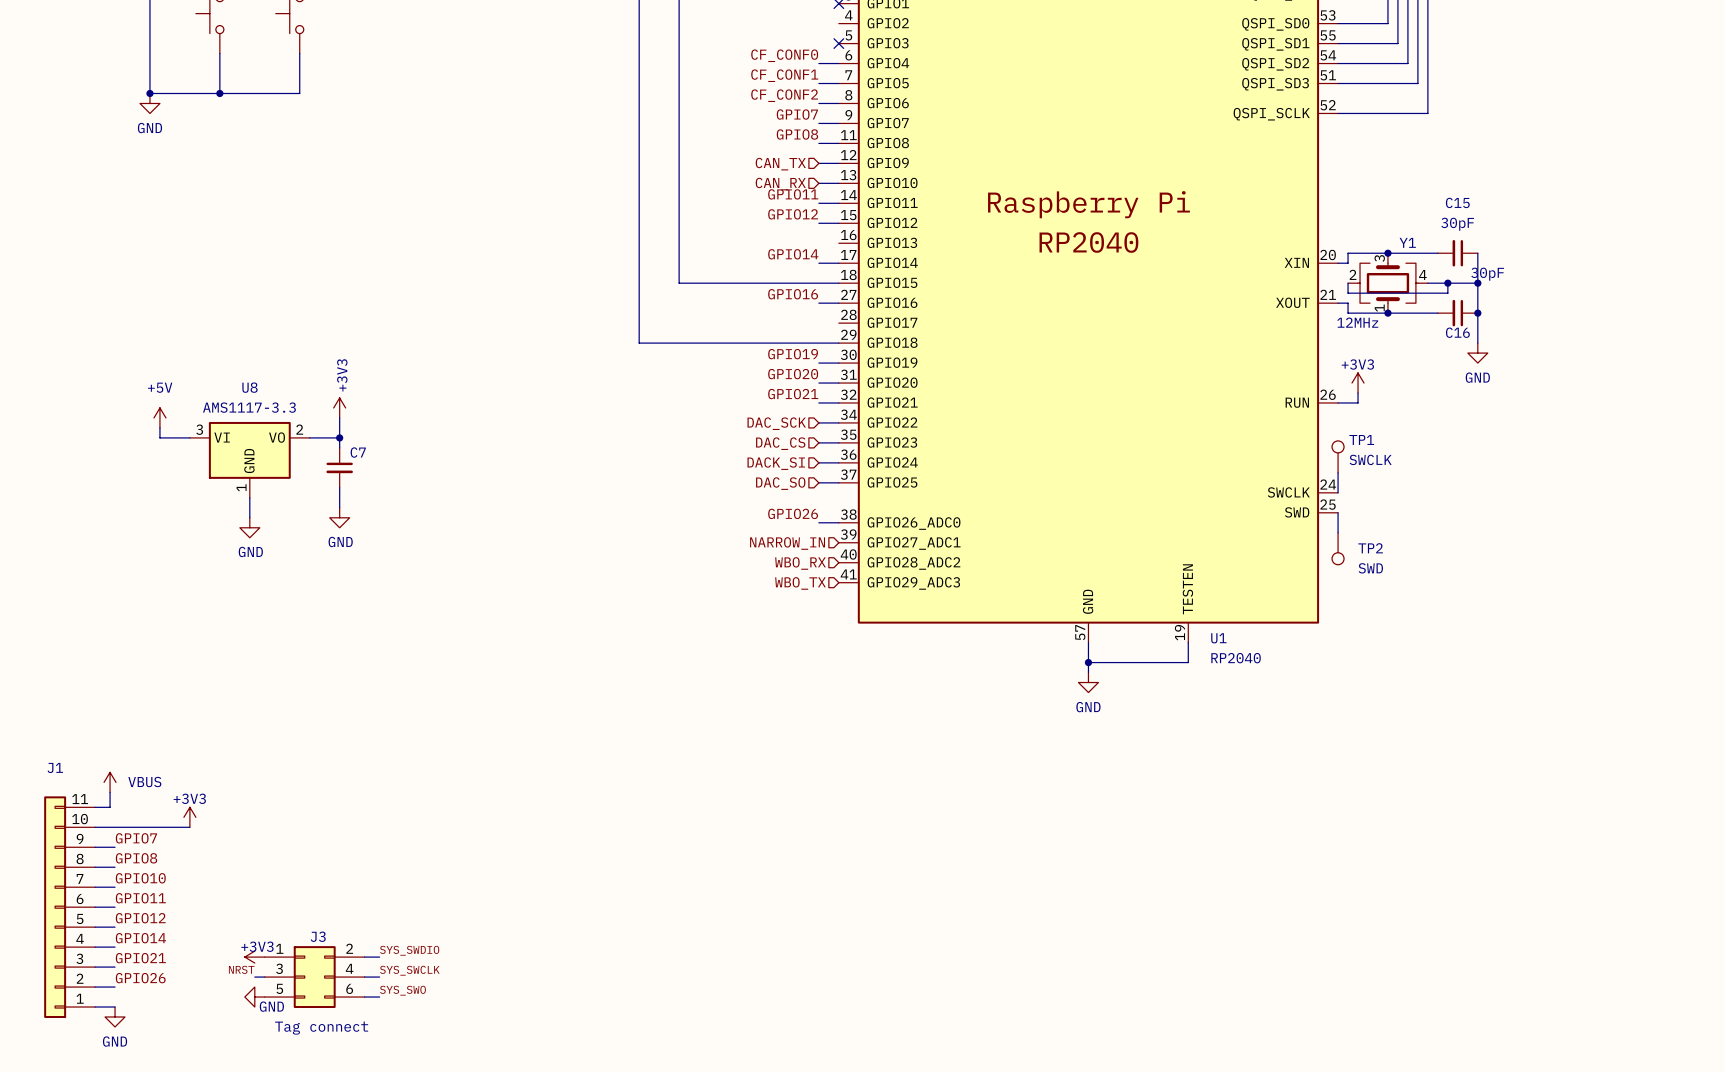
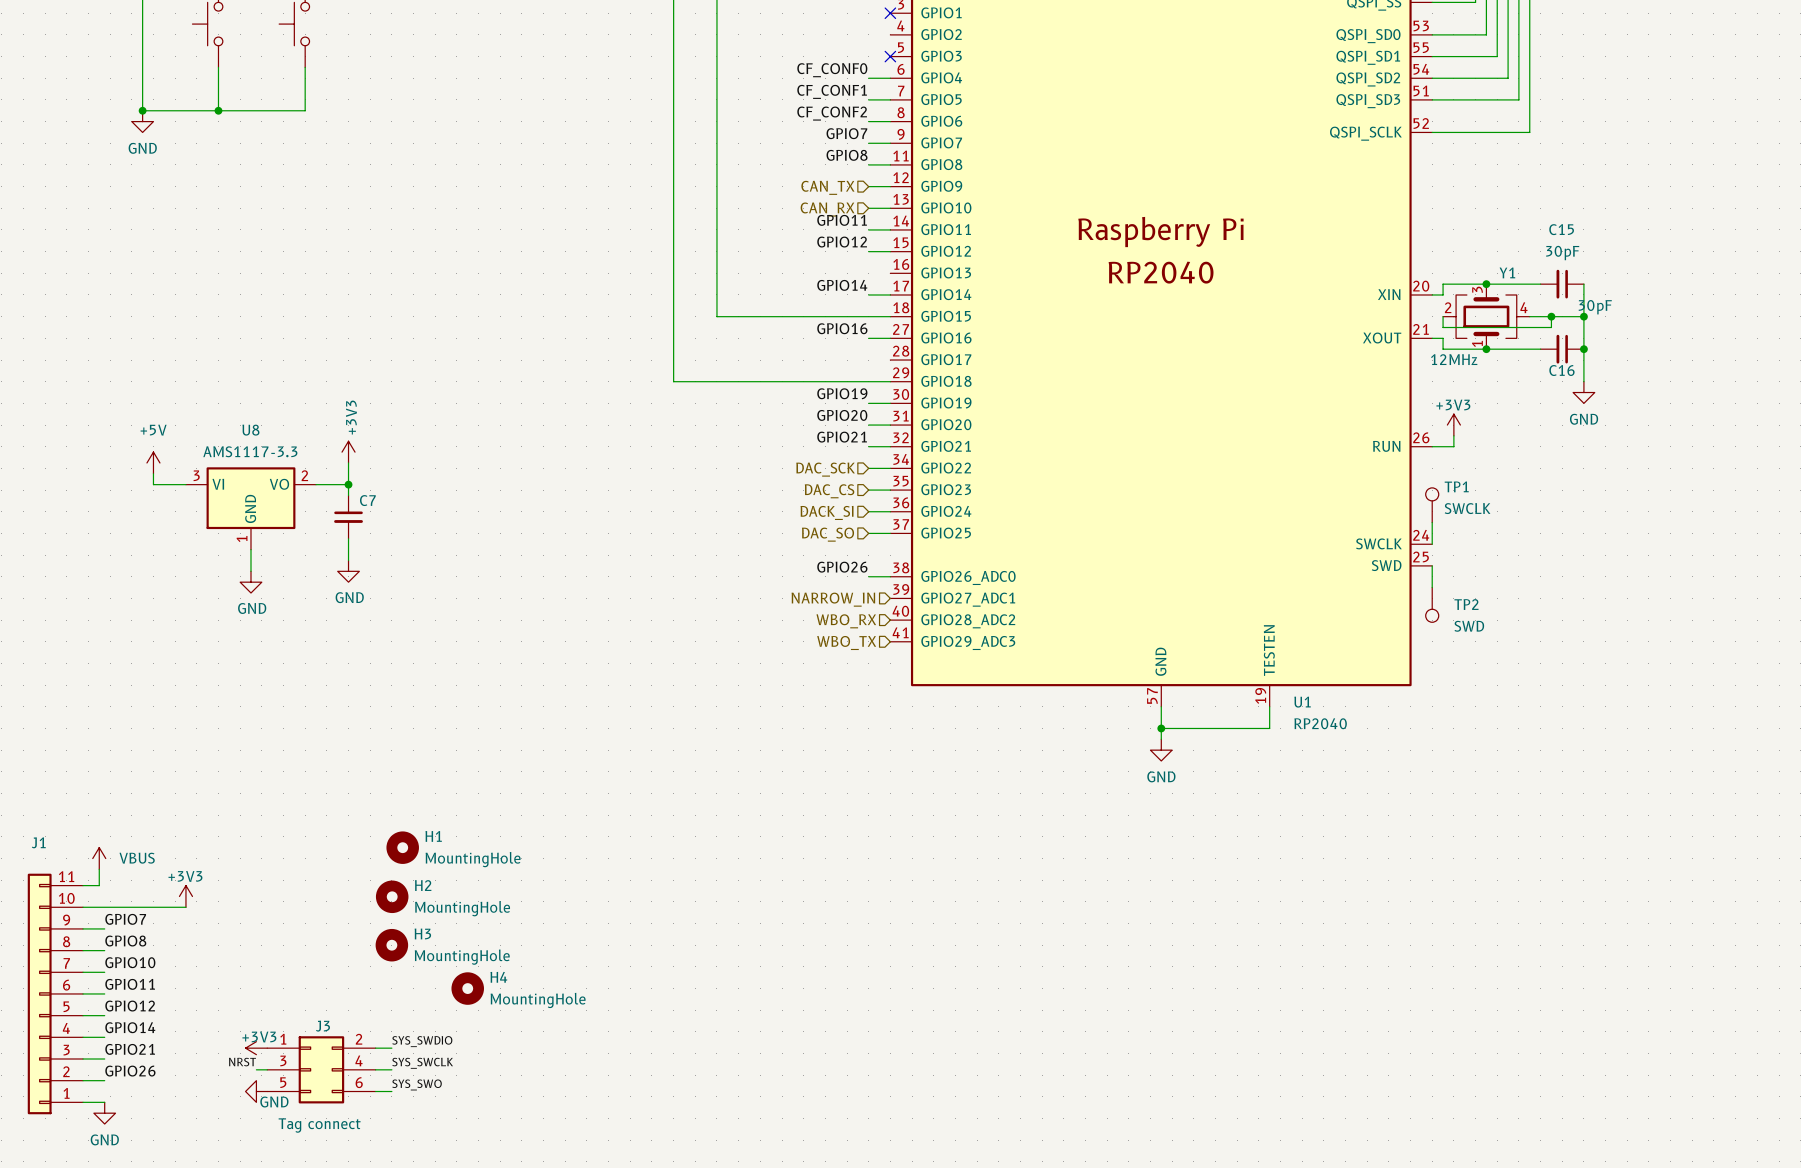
H1: none -> MountingHole (402, 847)
H2: none -> MountingHole (392, 896)
H3: none -> MountingHole (391, 945)
H4: none -> MountingHole (467, 988)

